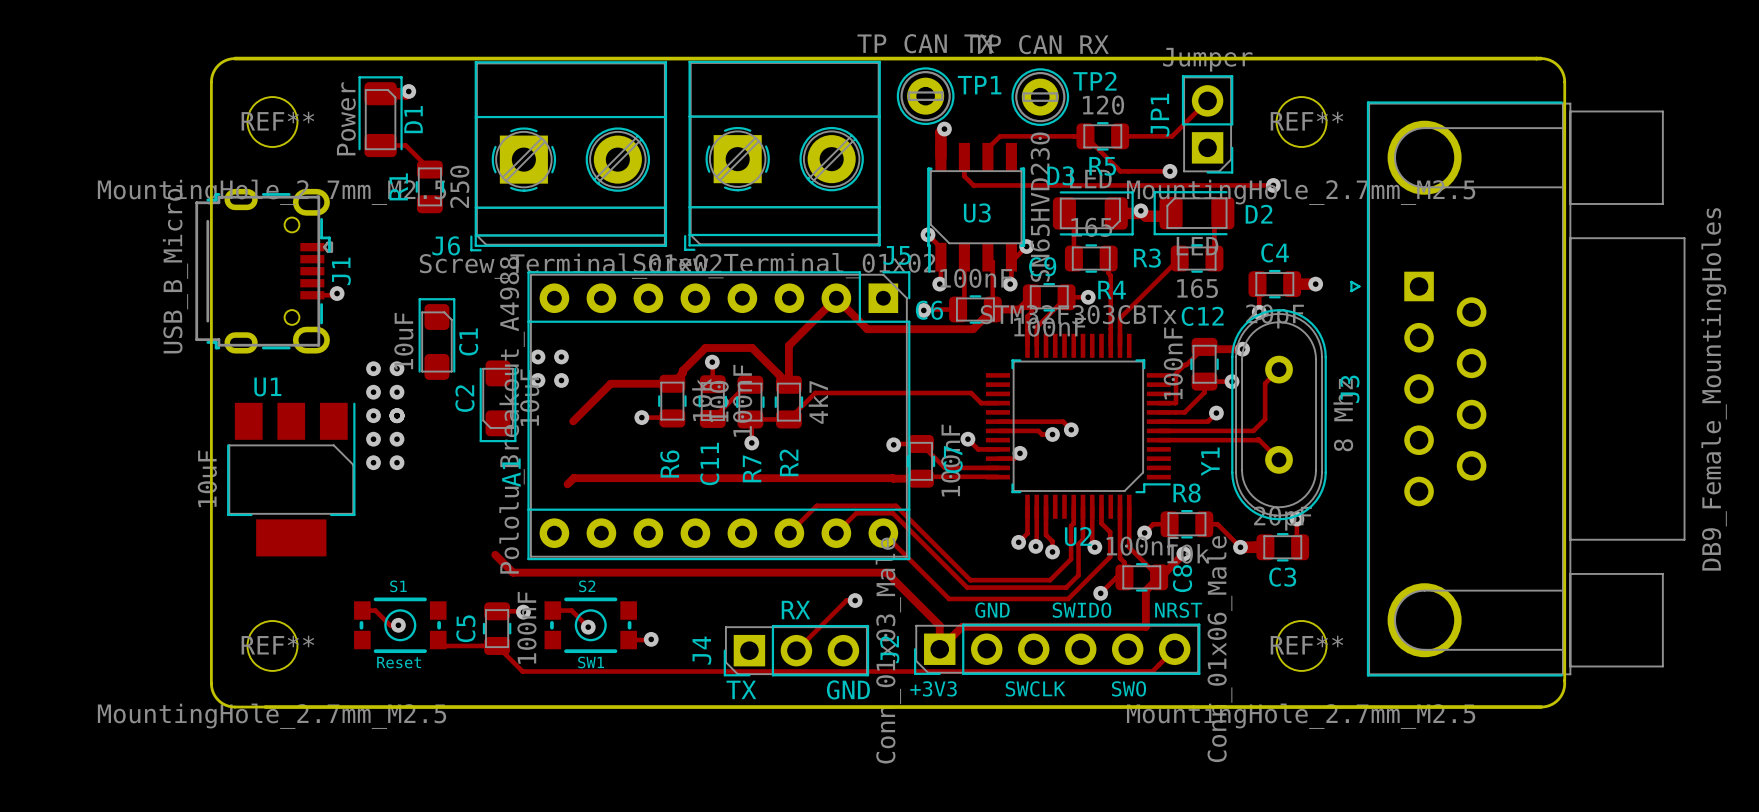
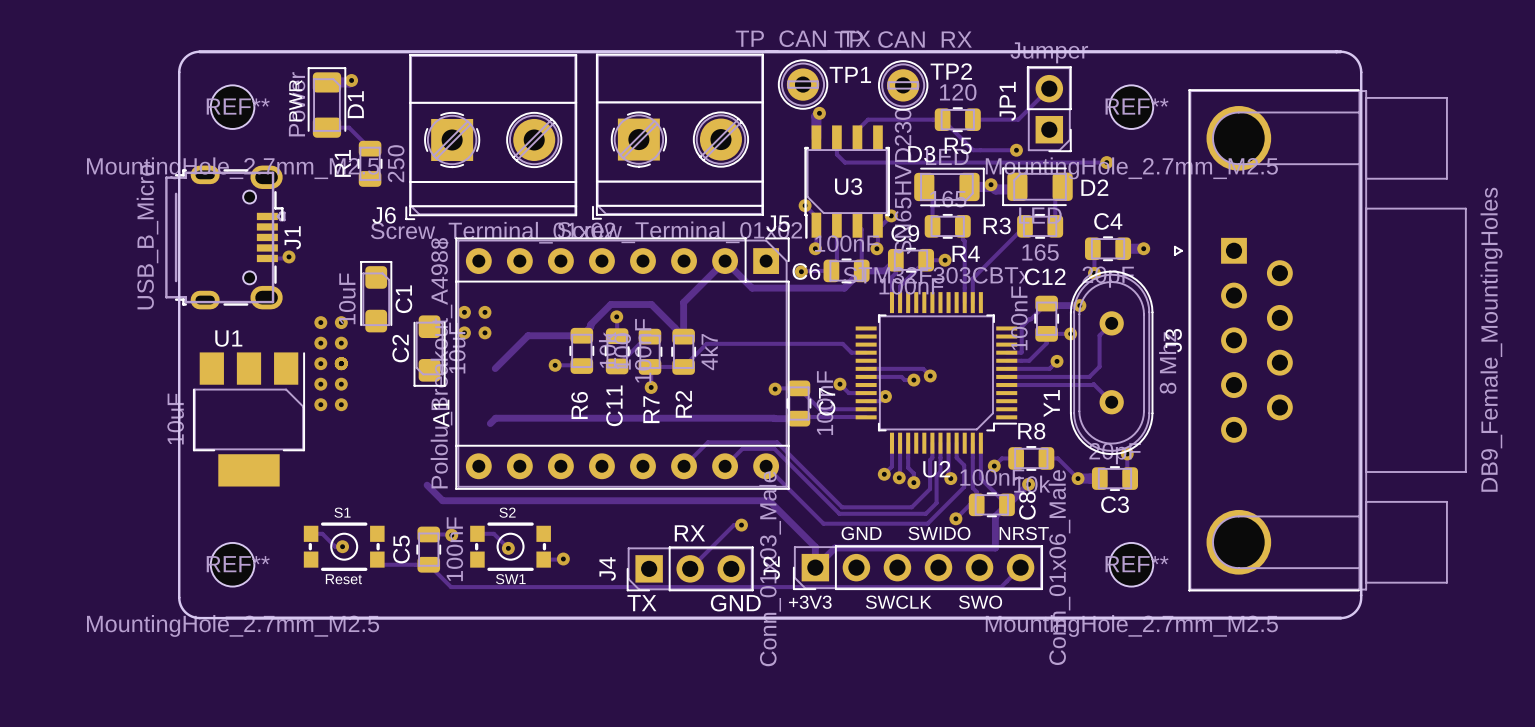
text: none -> PWR (295, 100)

